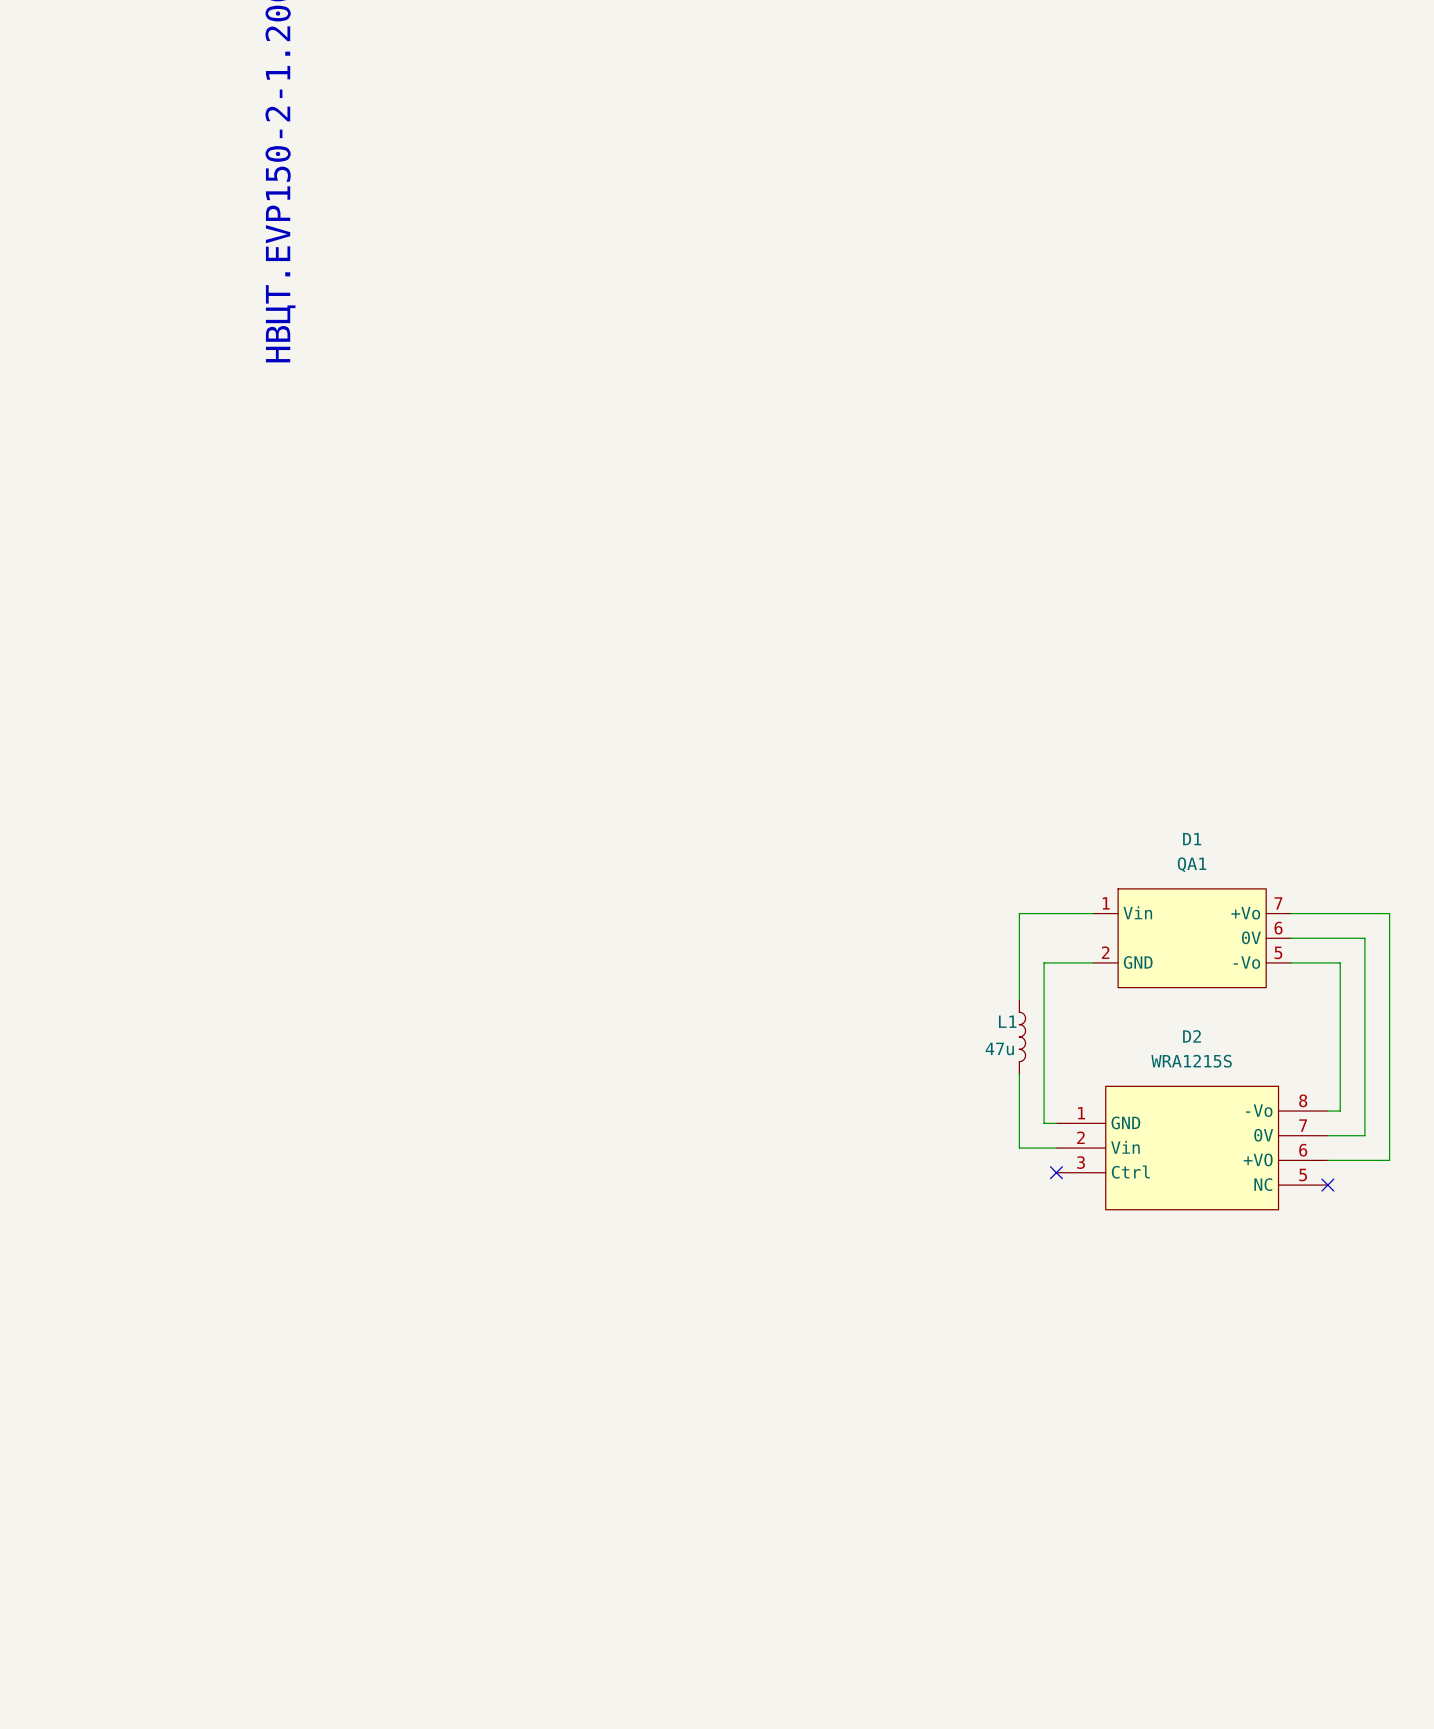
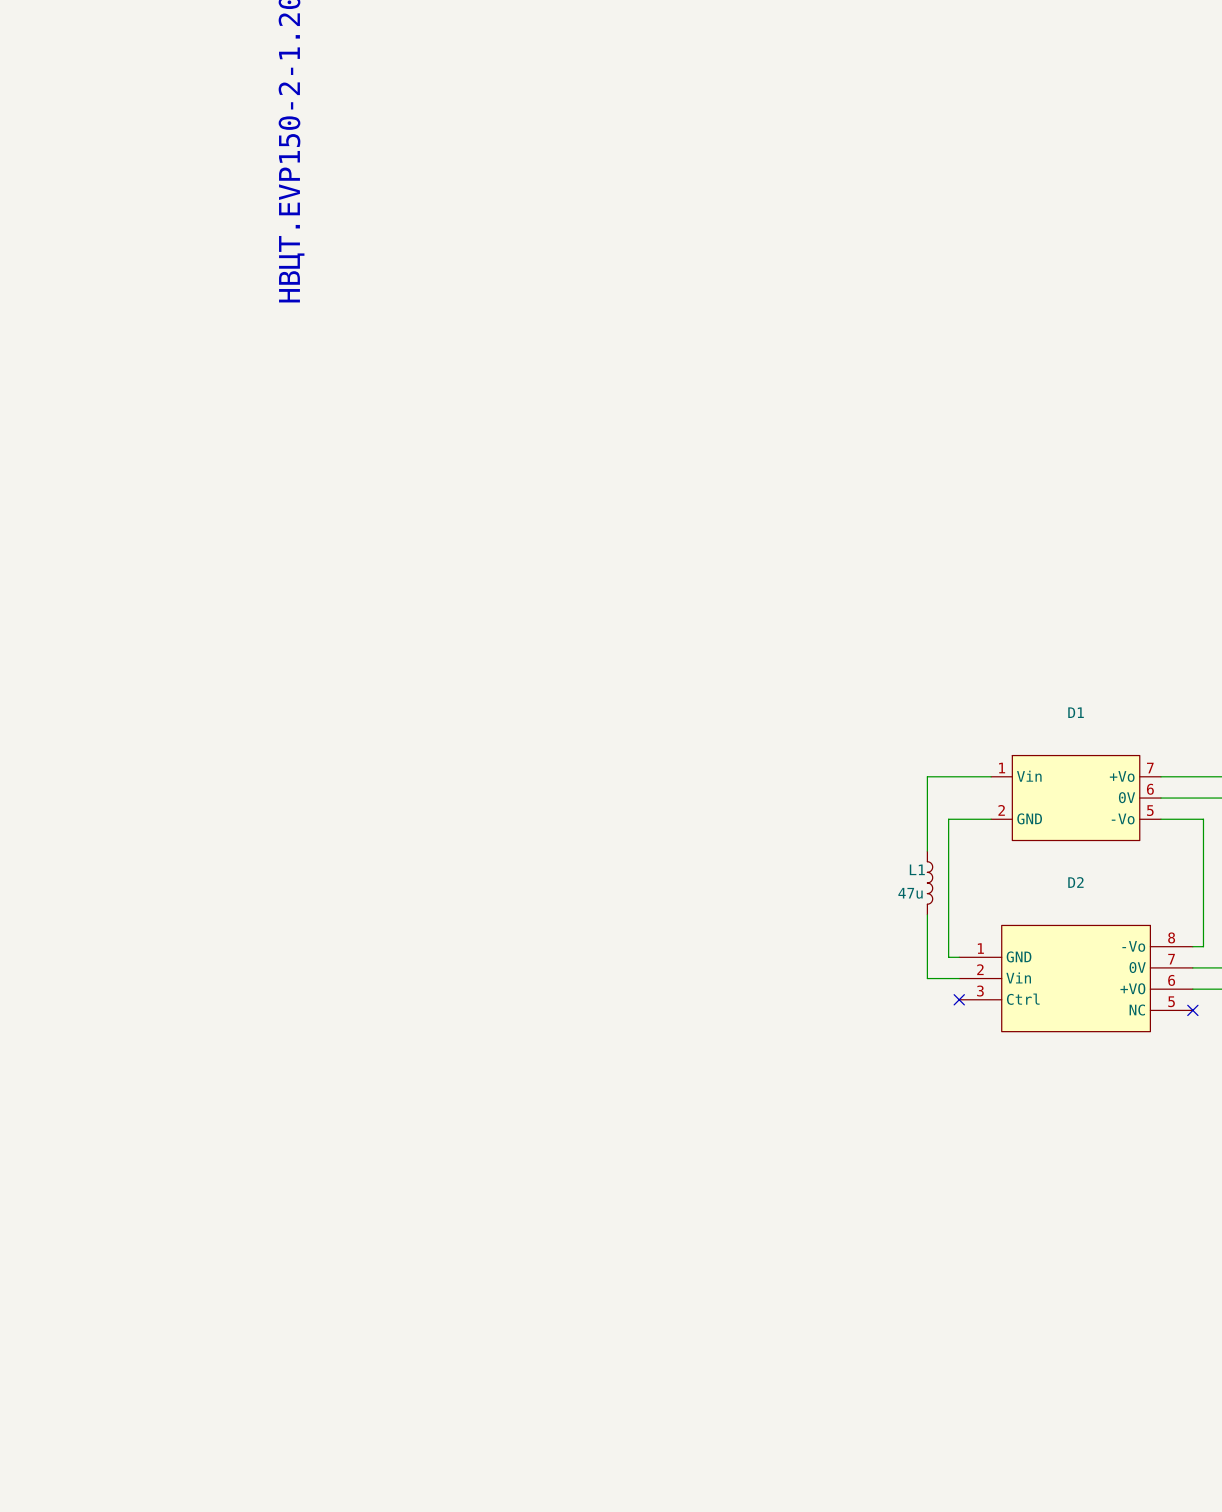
D1 value: QA1 (1192, 864) -> none
D2 value: WRA1215S (1191, 1061) -> none

